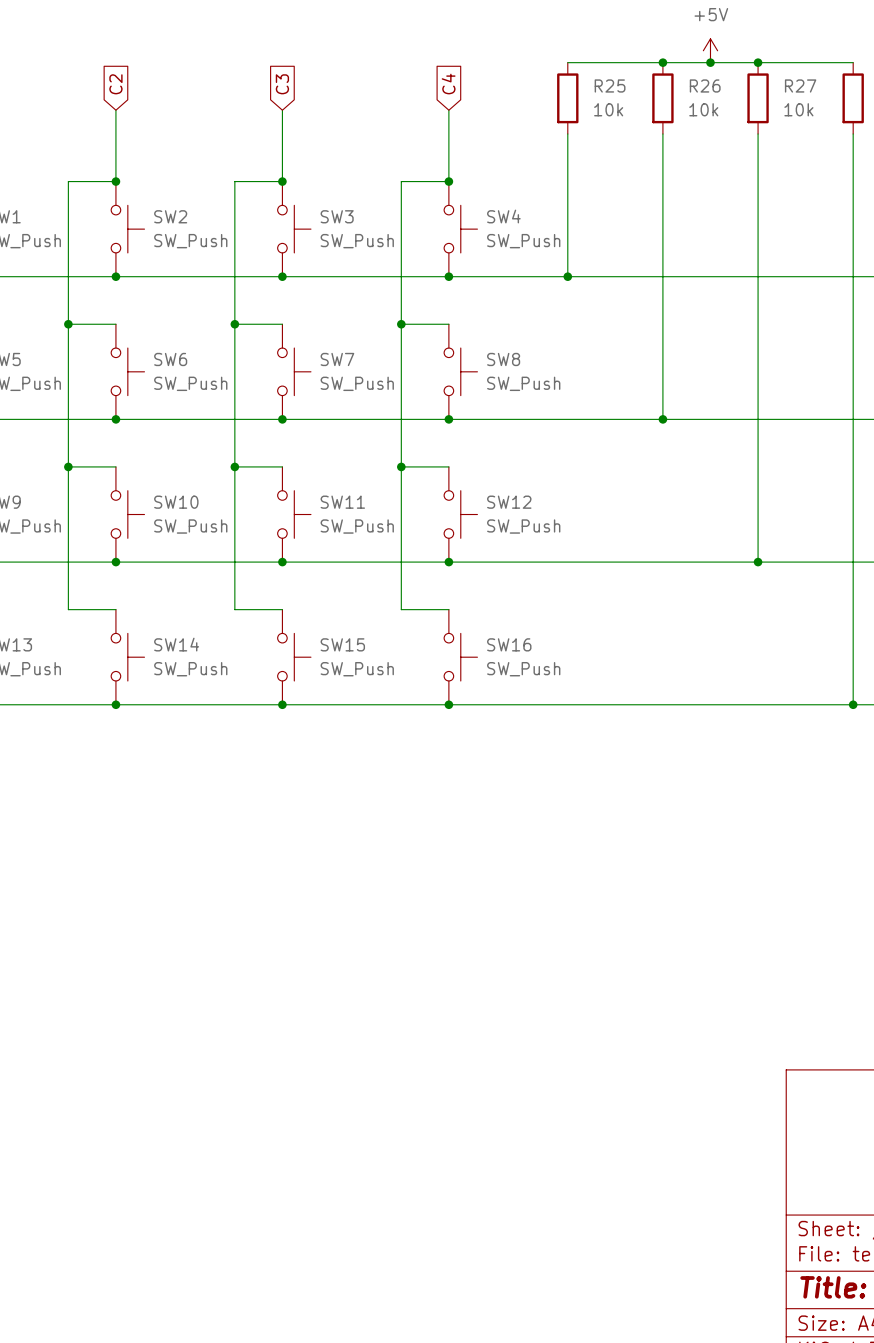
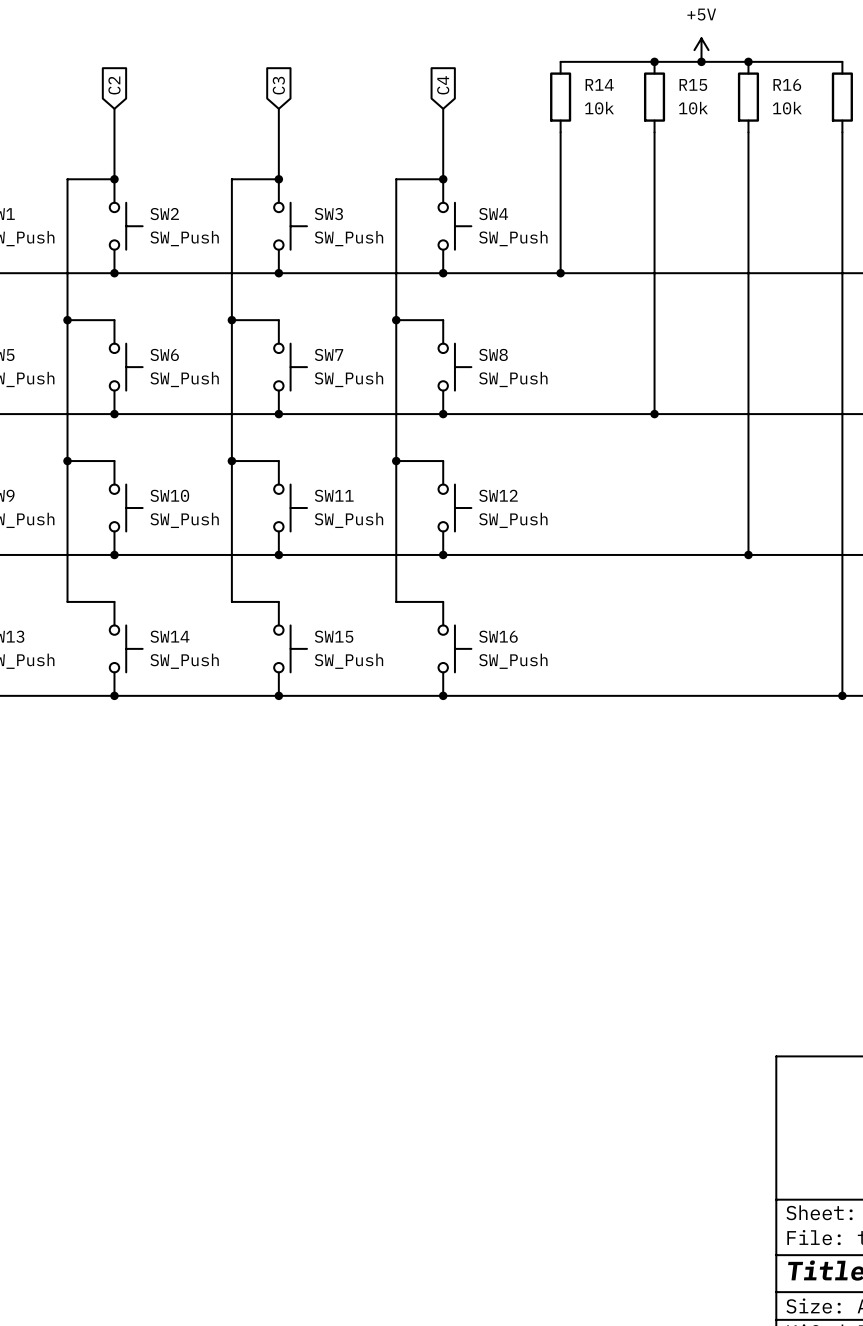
R25 name: R25 (610, 85) -> R14 (599, 84)
R26 name: R26 (705, 85) -> R15 (693, 85)
R27 name: R27 (800, 85) -> R16 (787, 85)

